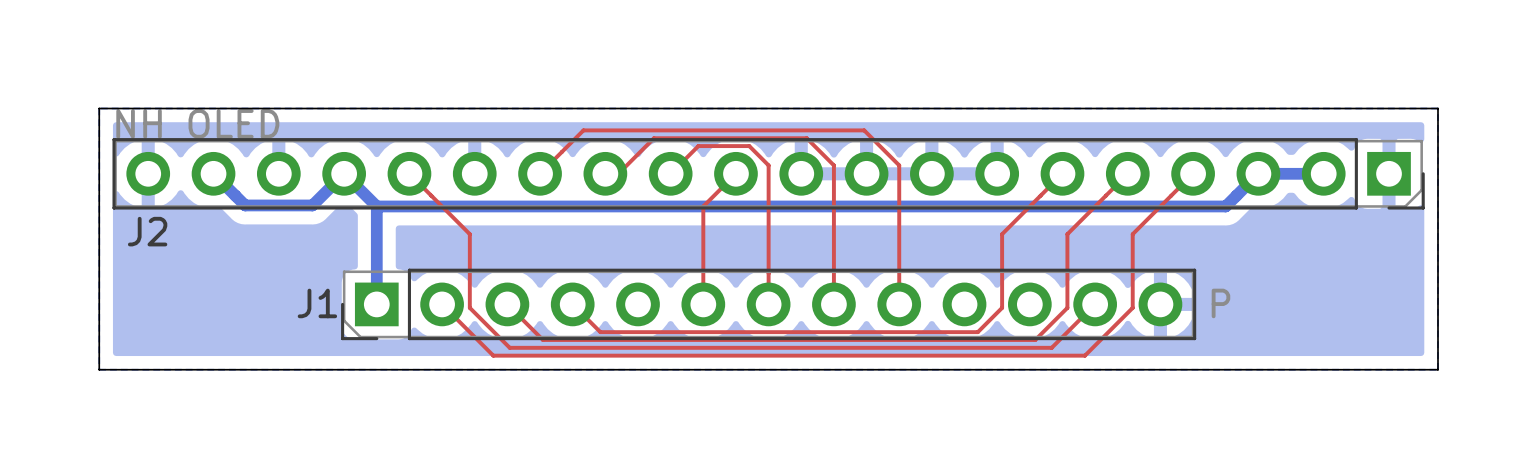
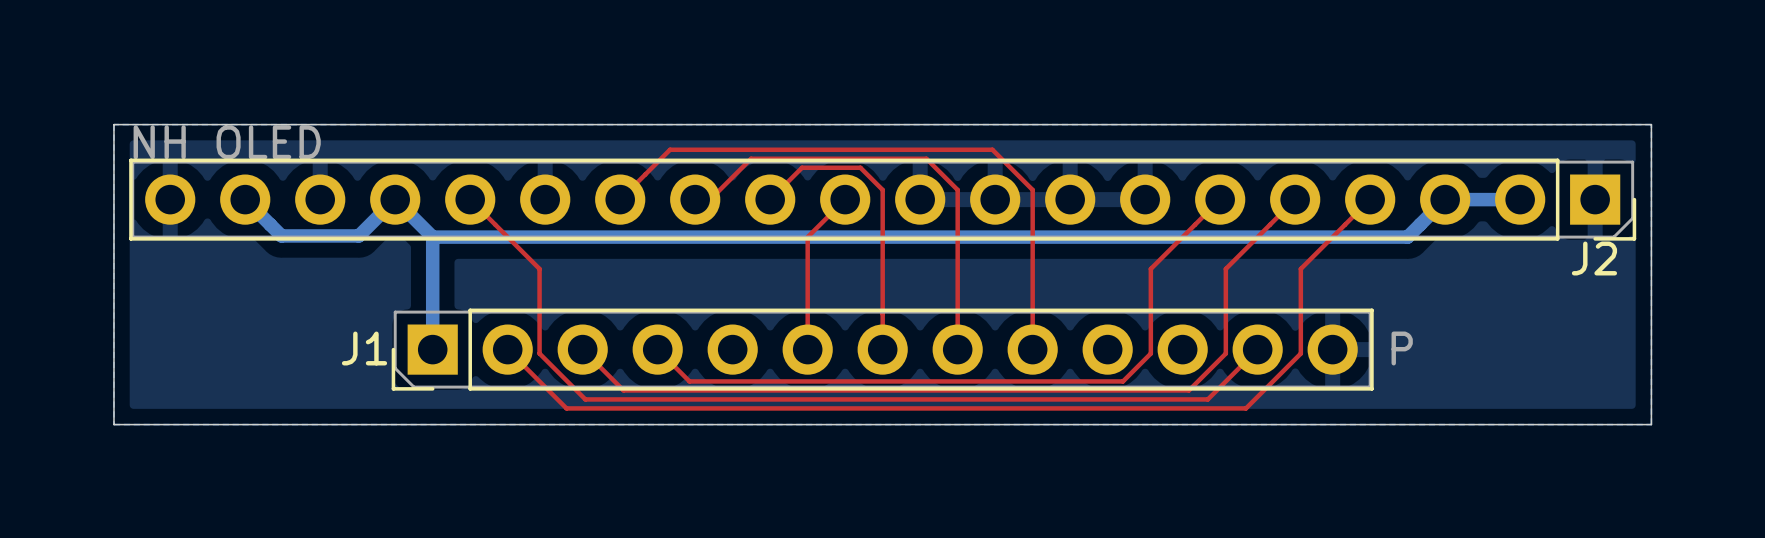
J2 name position: J2 (147, 231) -> J2 (1594, 258)

